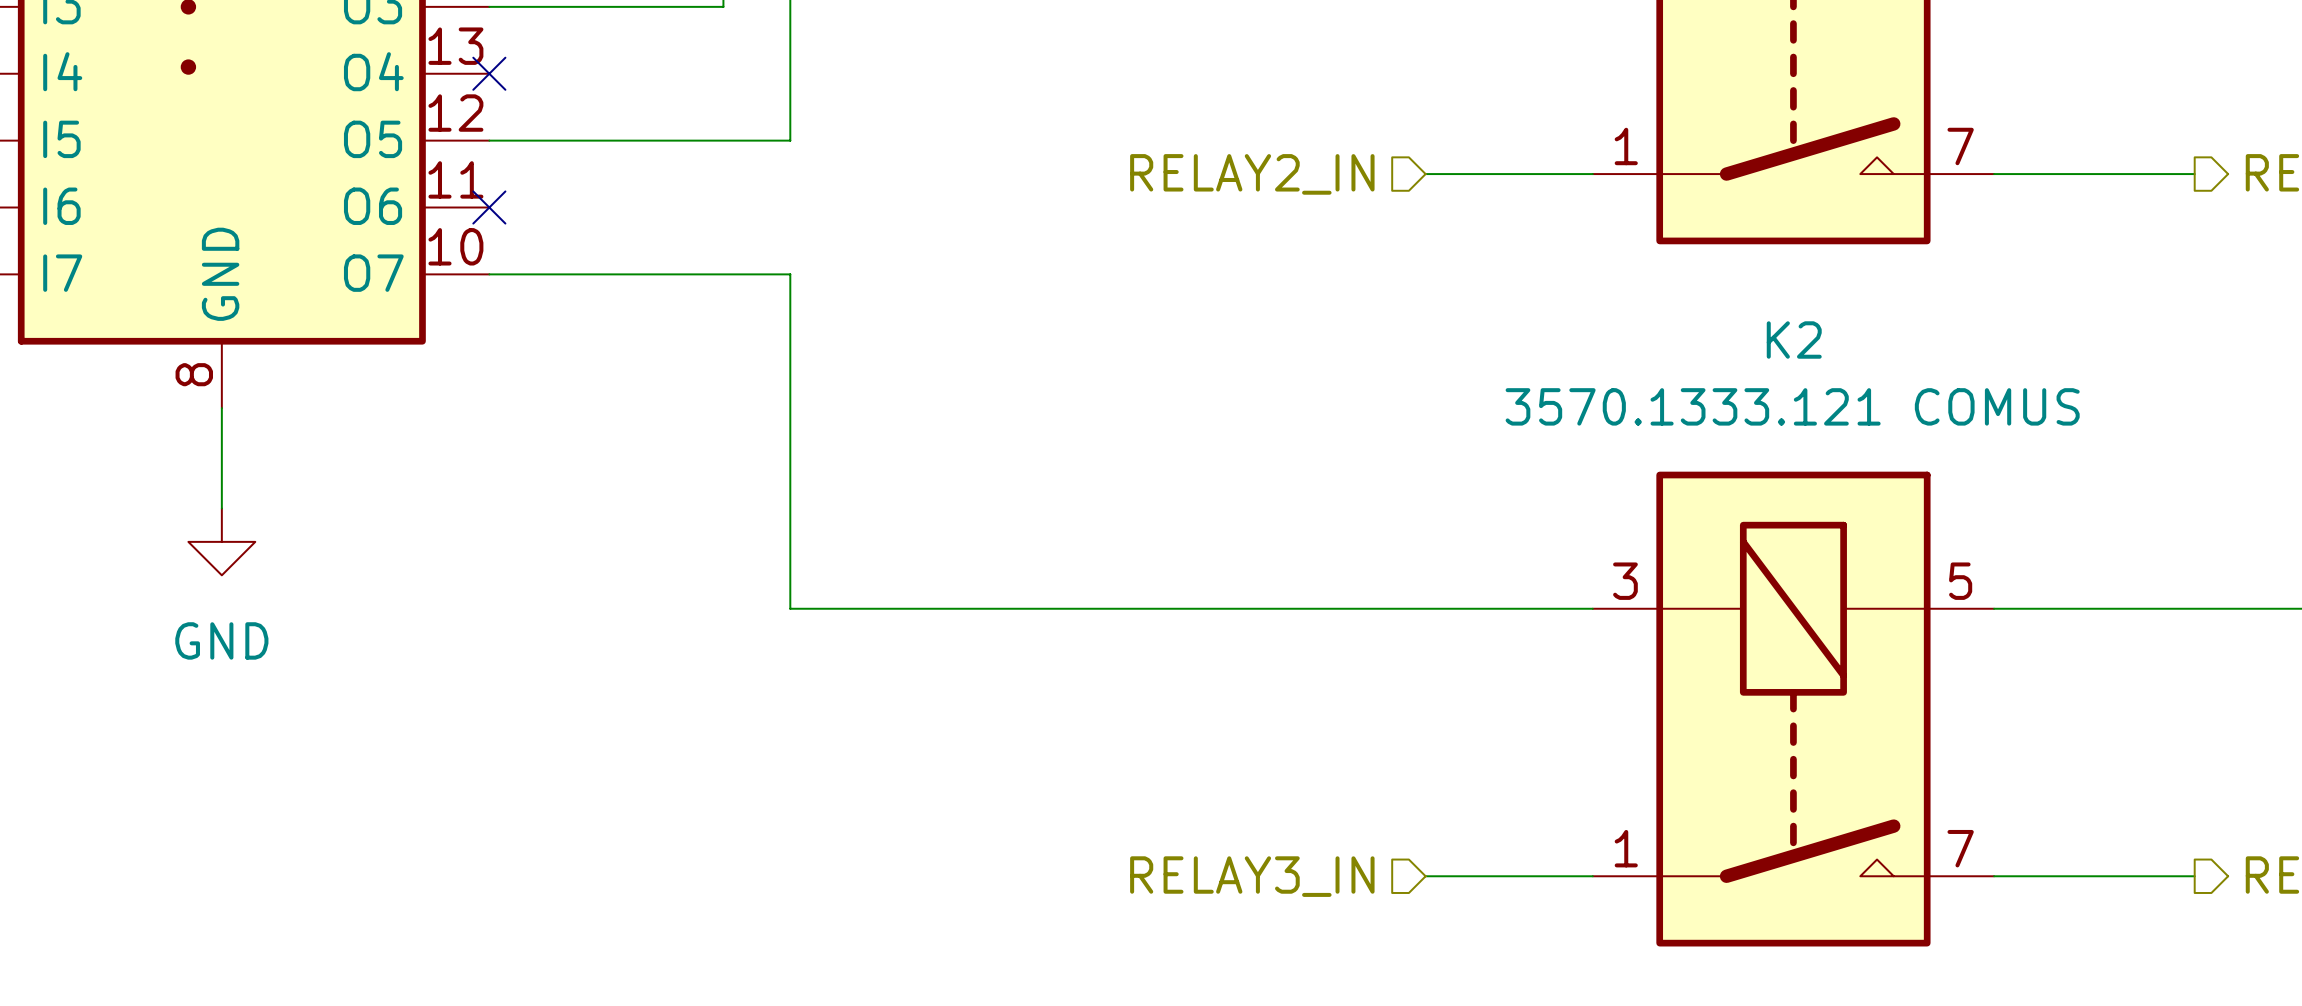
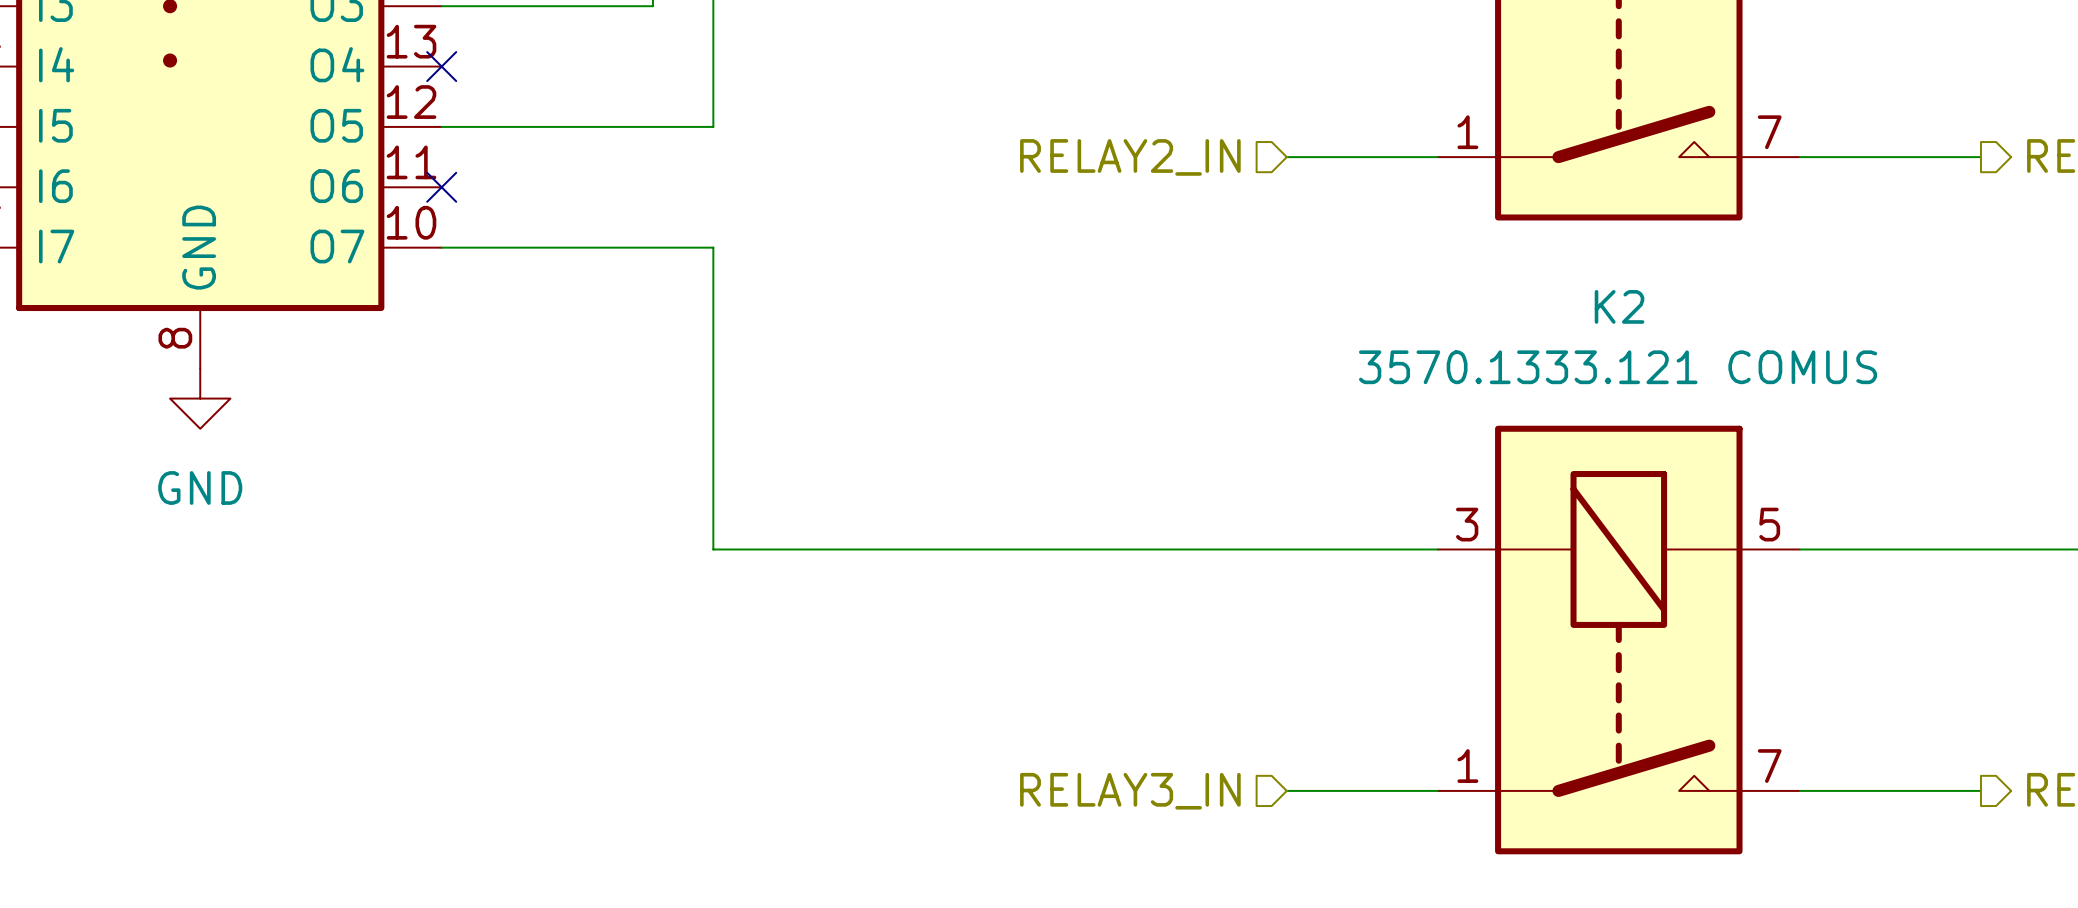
wire: (221, 408) (221, 508) -> none
power symbol position: GND (221, 541) -> GND (200, 398)

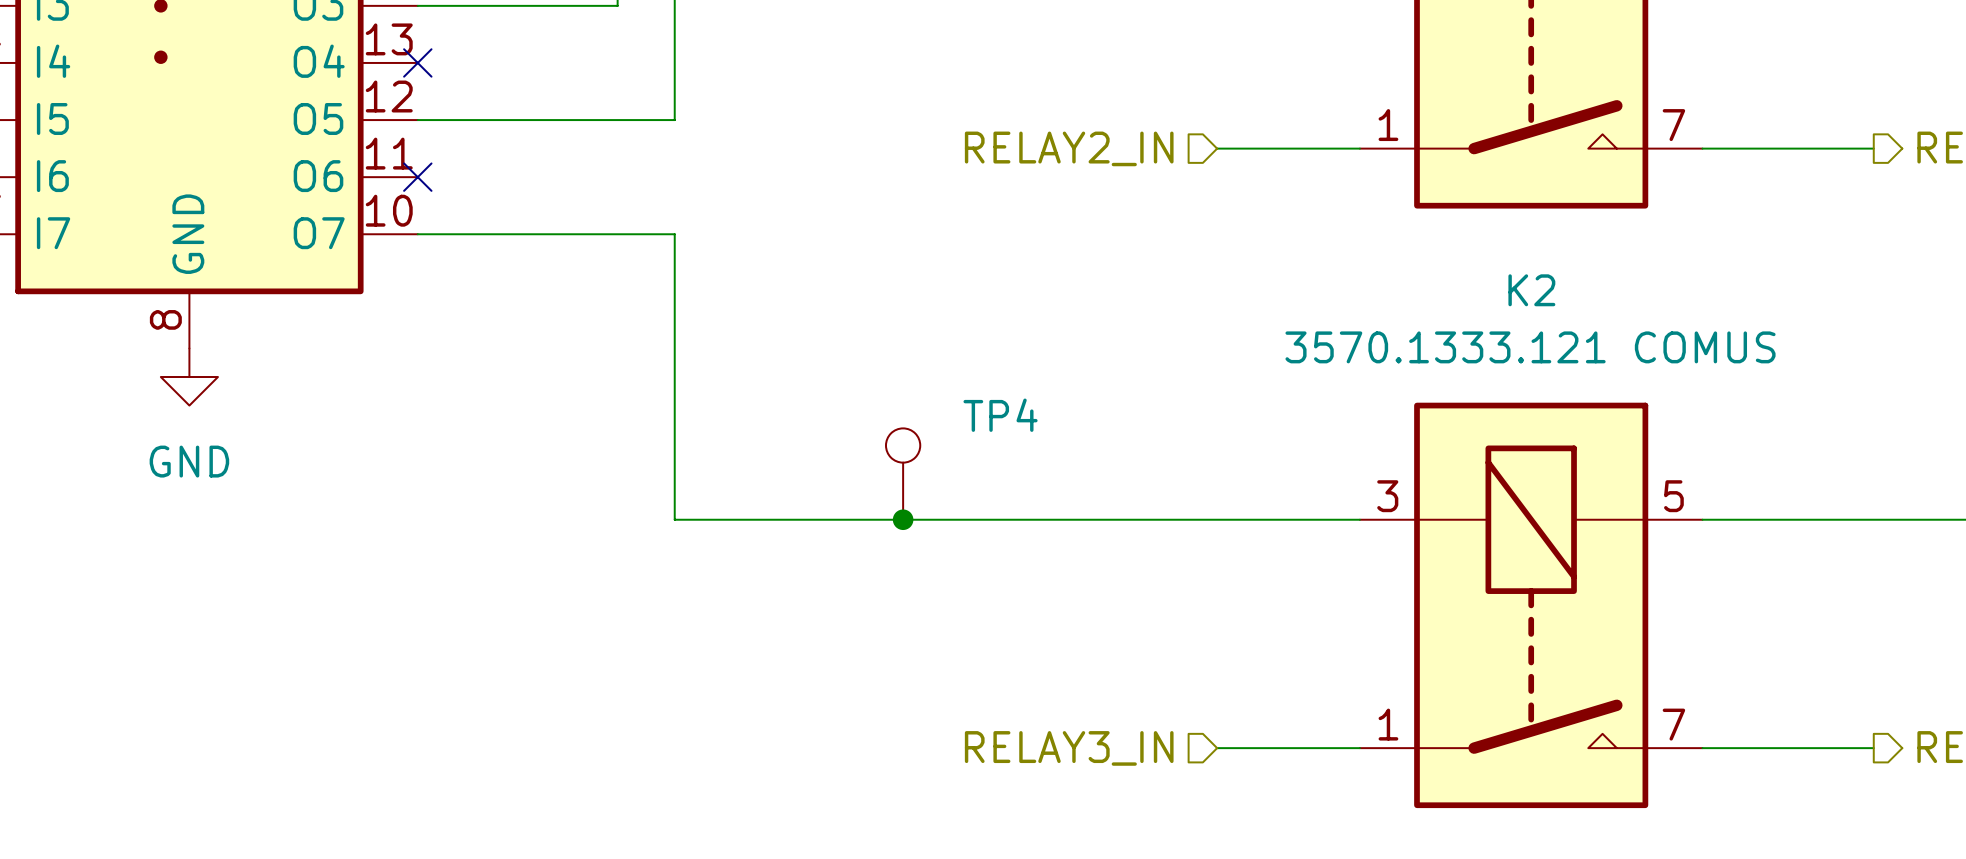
TP4: none -> (903, 474)
junction: none -> (903, 519)

